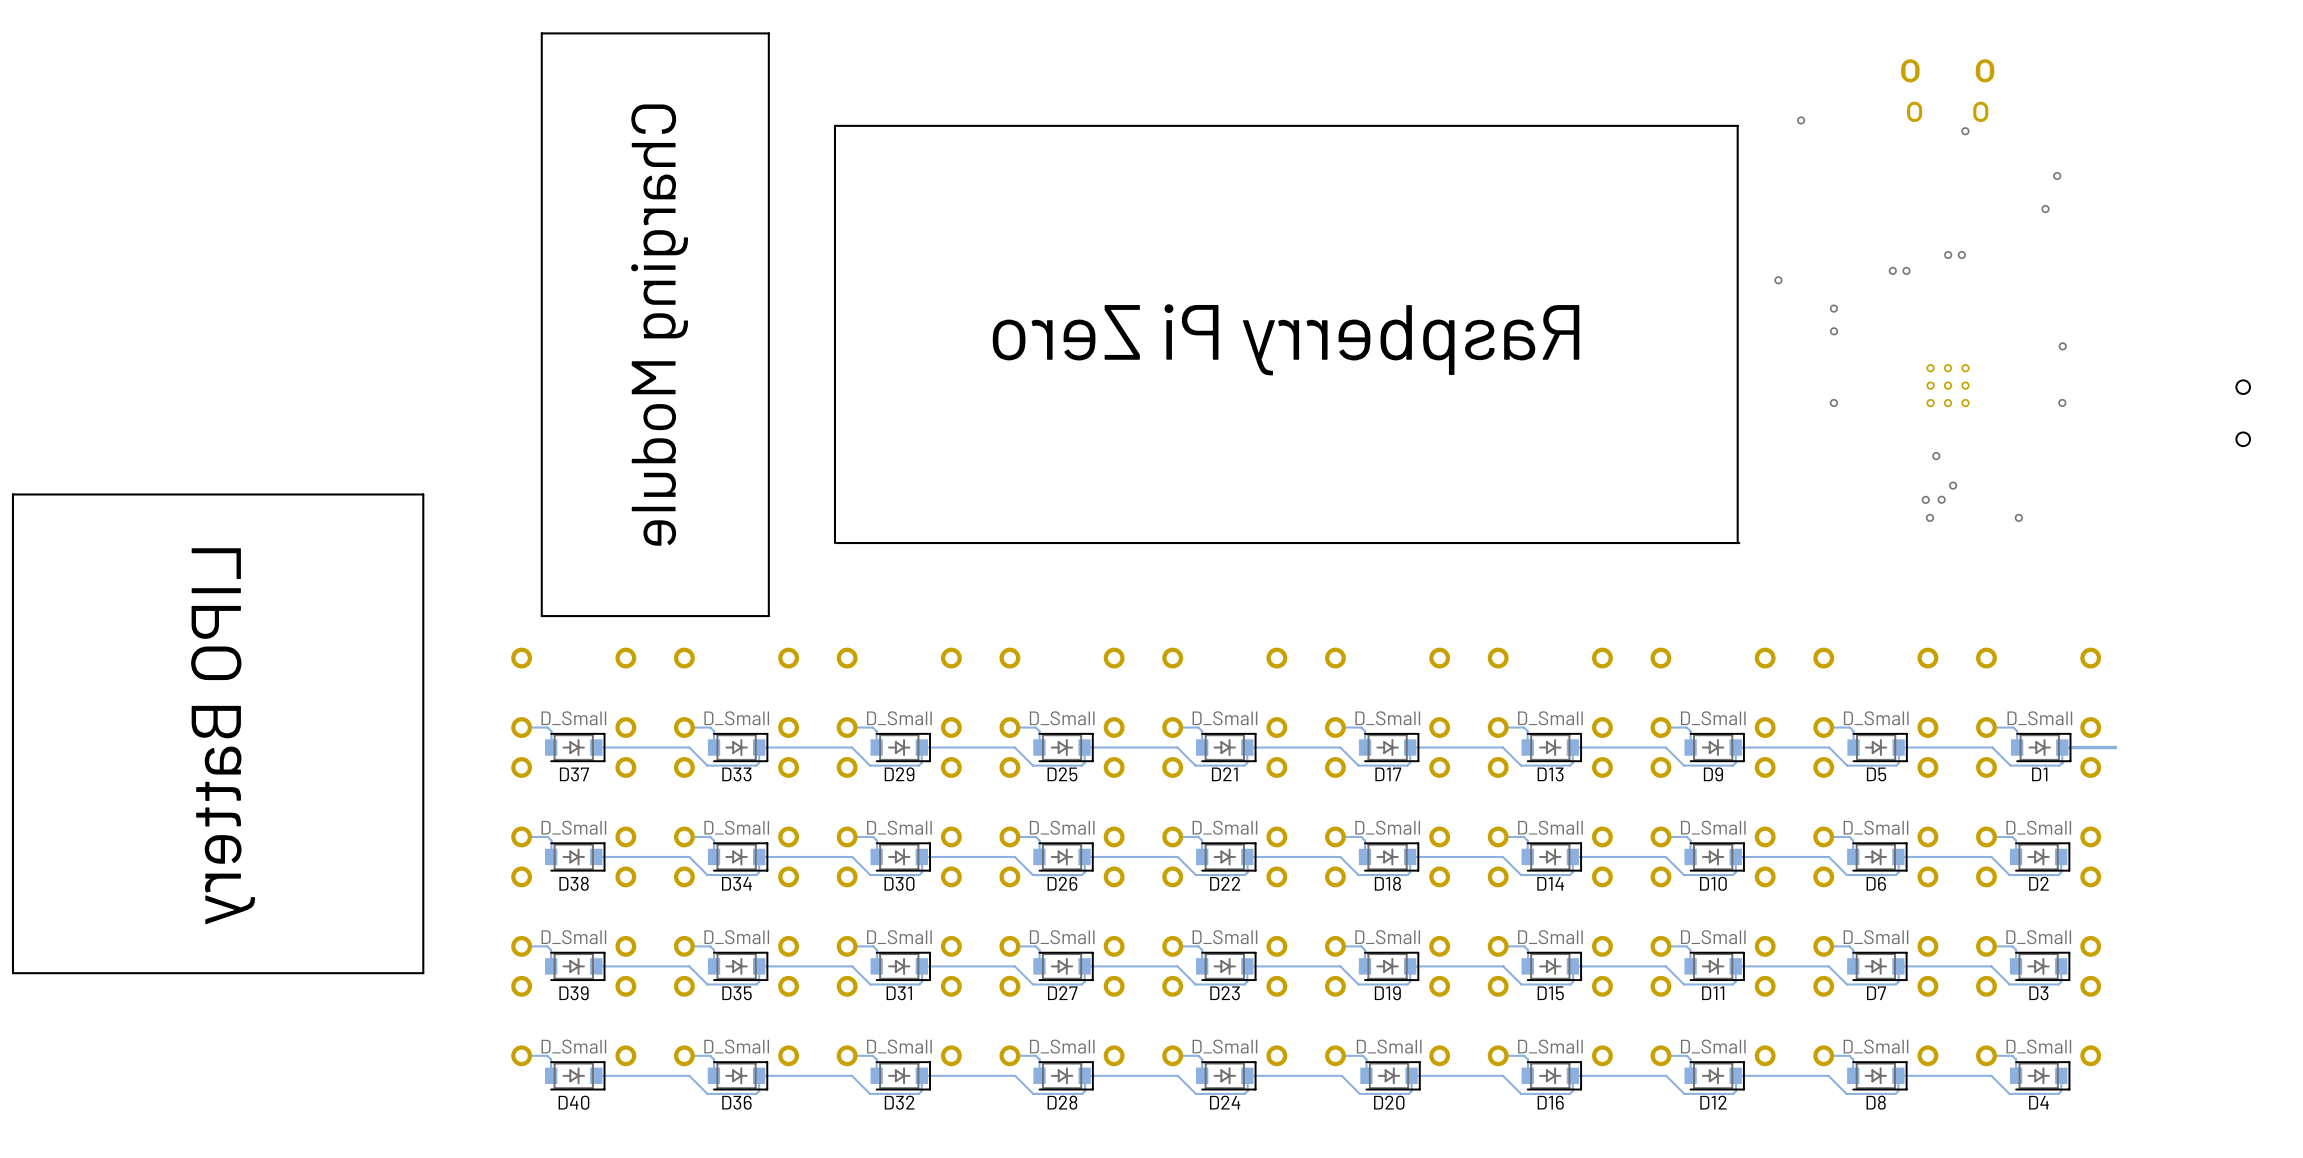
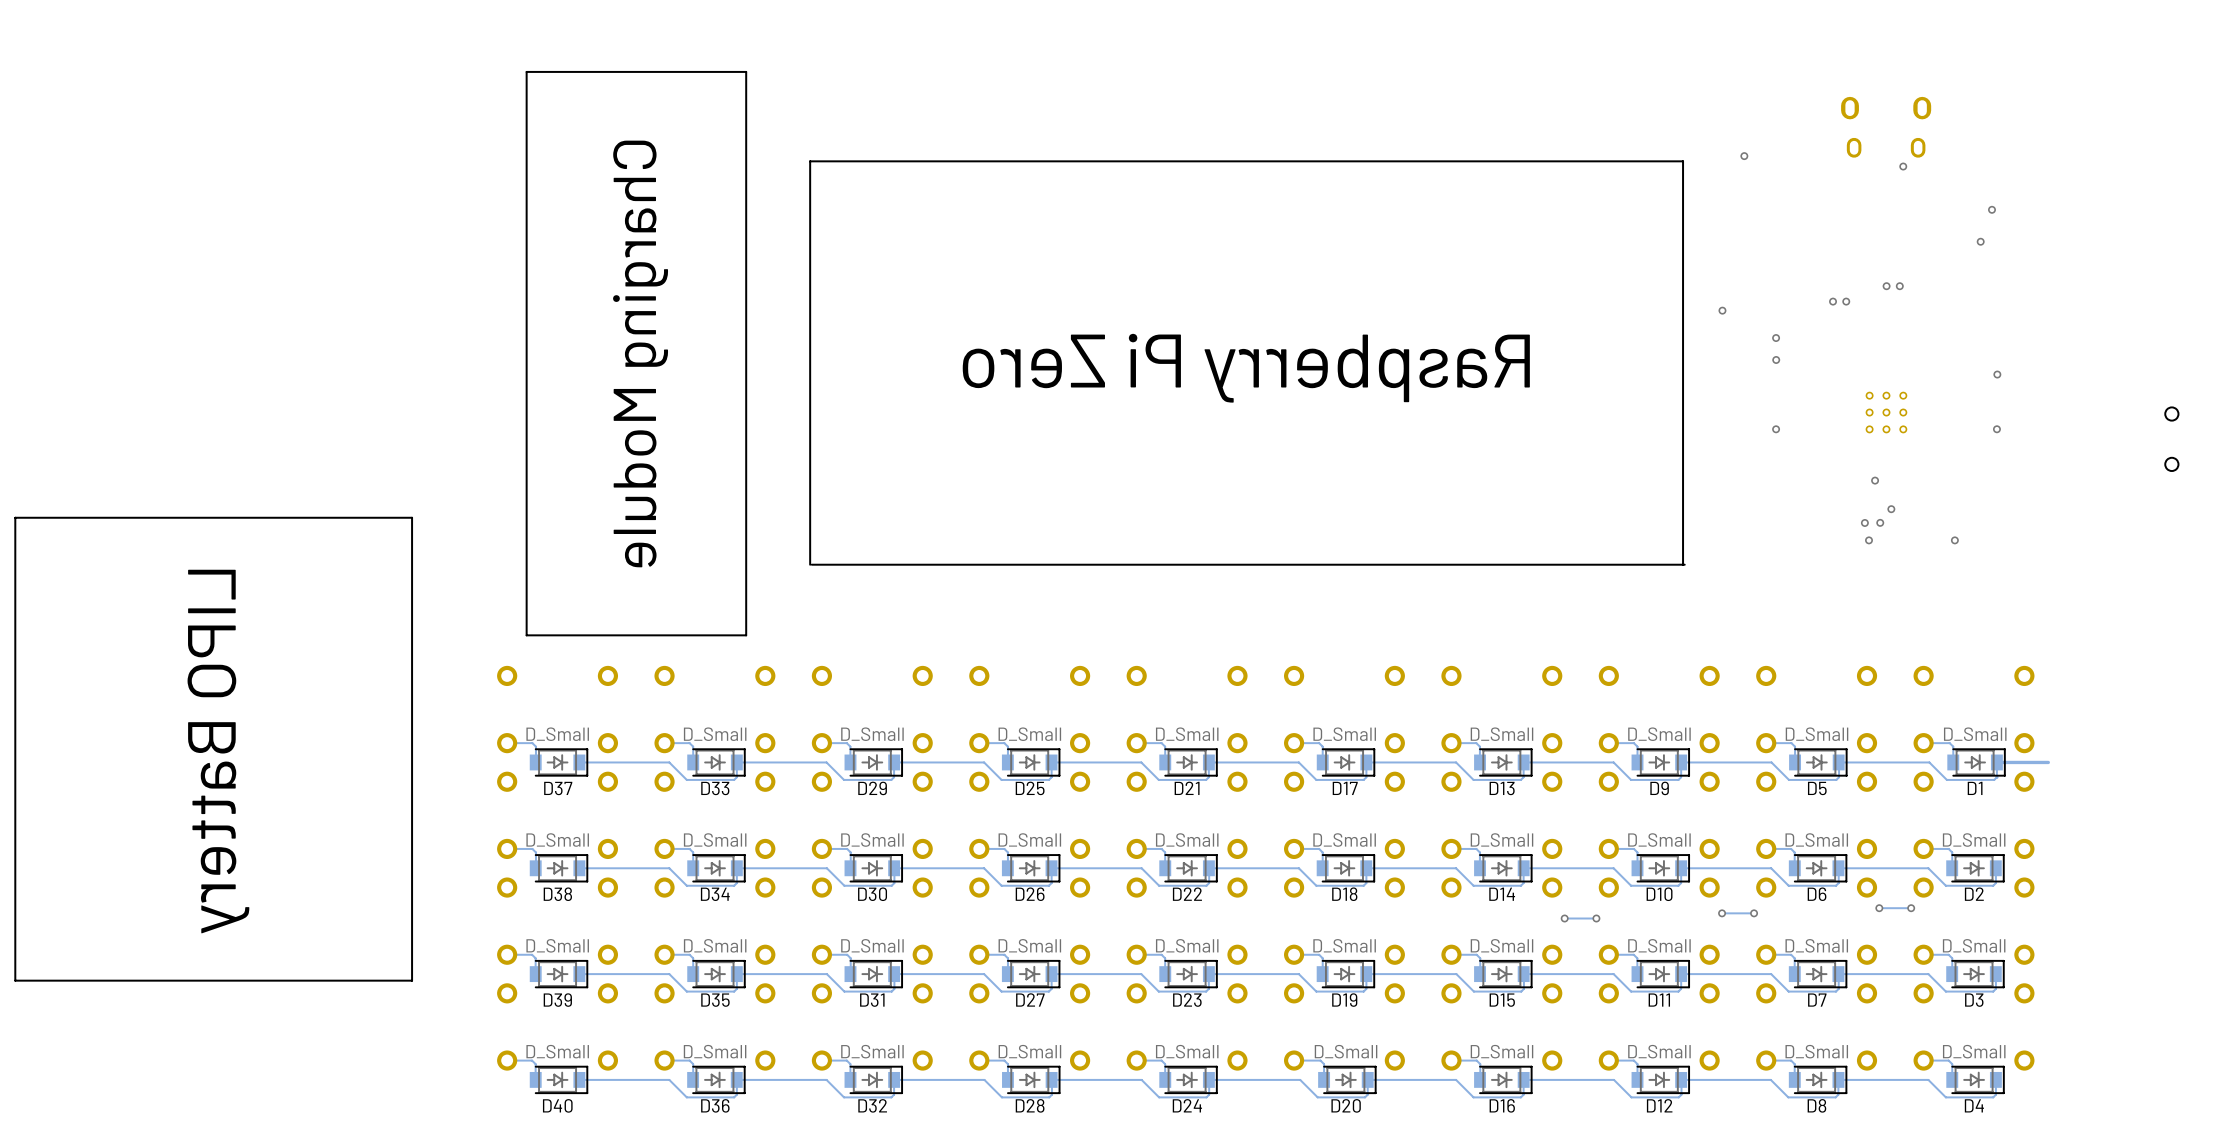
via: none -> (1879, 908)
track: none -> (1911, 908) (1879, 908)
via: none -> (1911, 908)
via: none -> (1722, 913)
track: none -> (1754, 913) (1722, 913)
via: none -> (1754, 913)
via: none -> (1564, 918)
track: none -> (1596, 918) (1564, 918)
via: none -> (1596, 918)

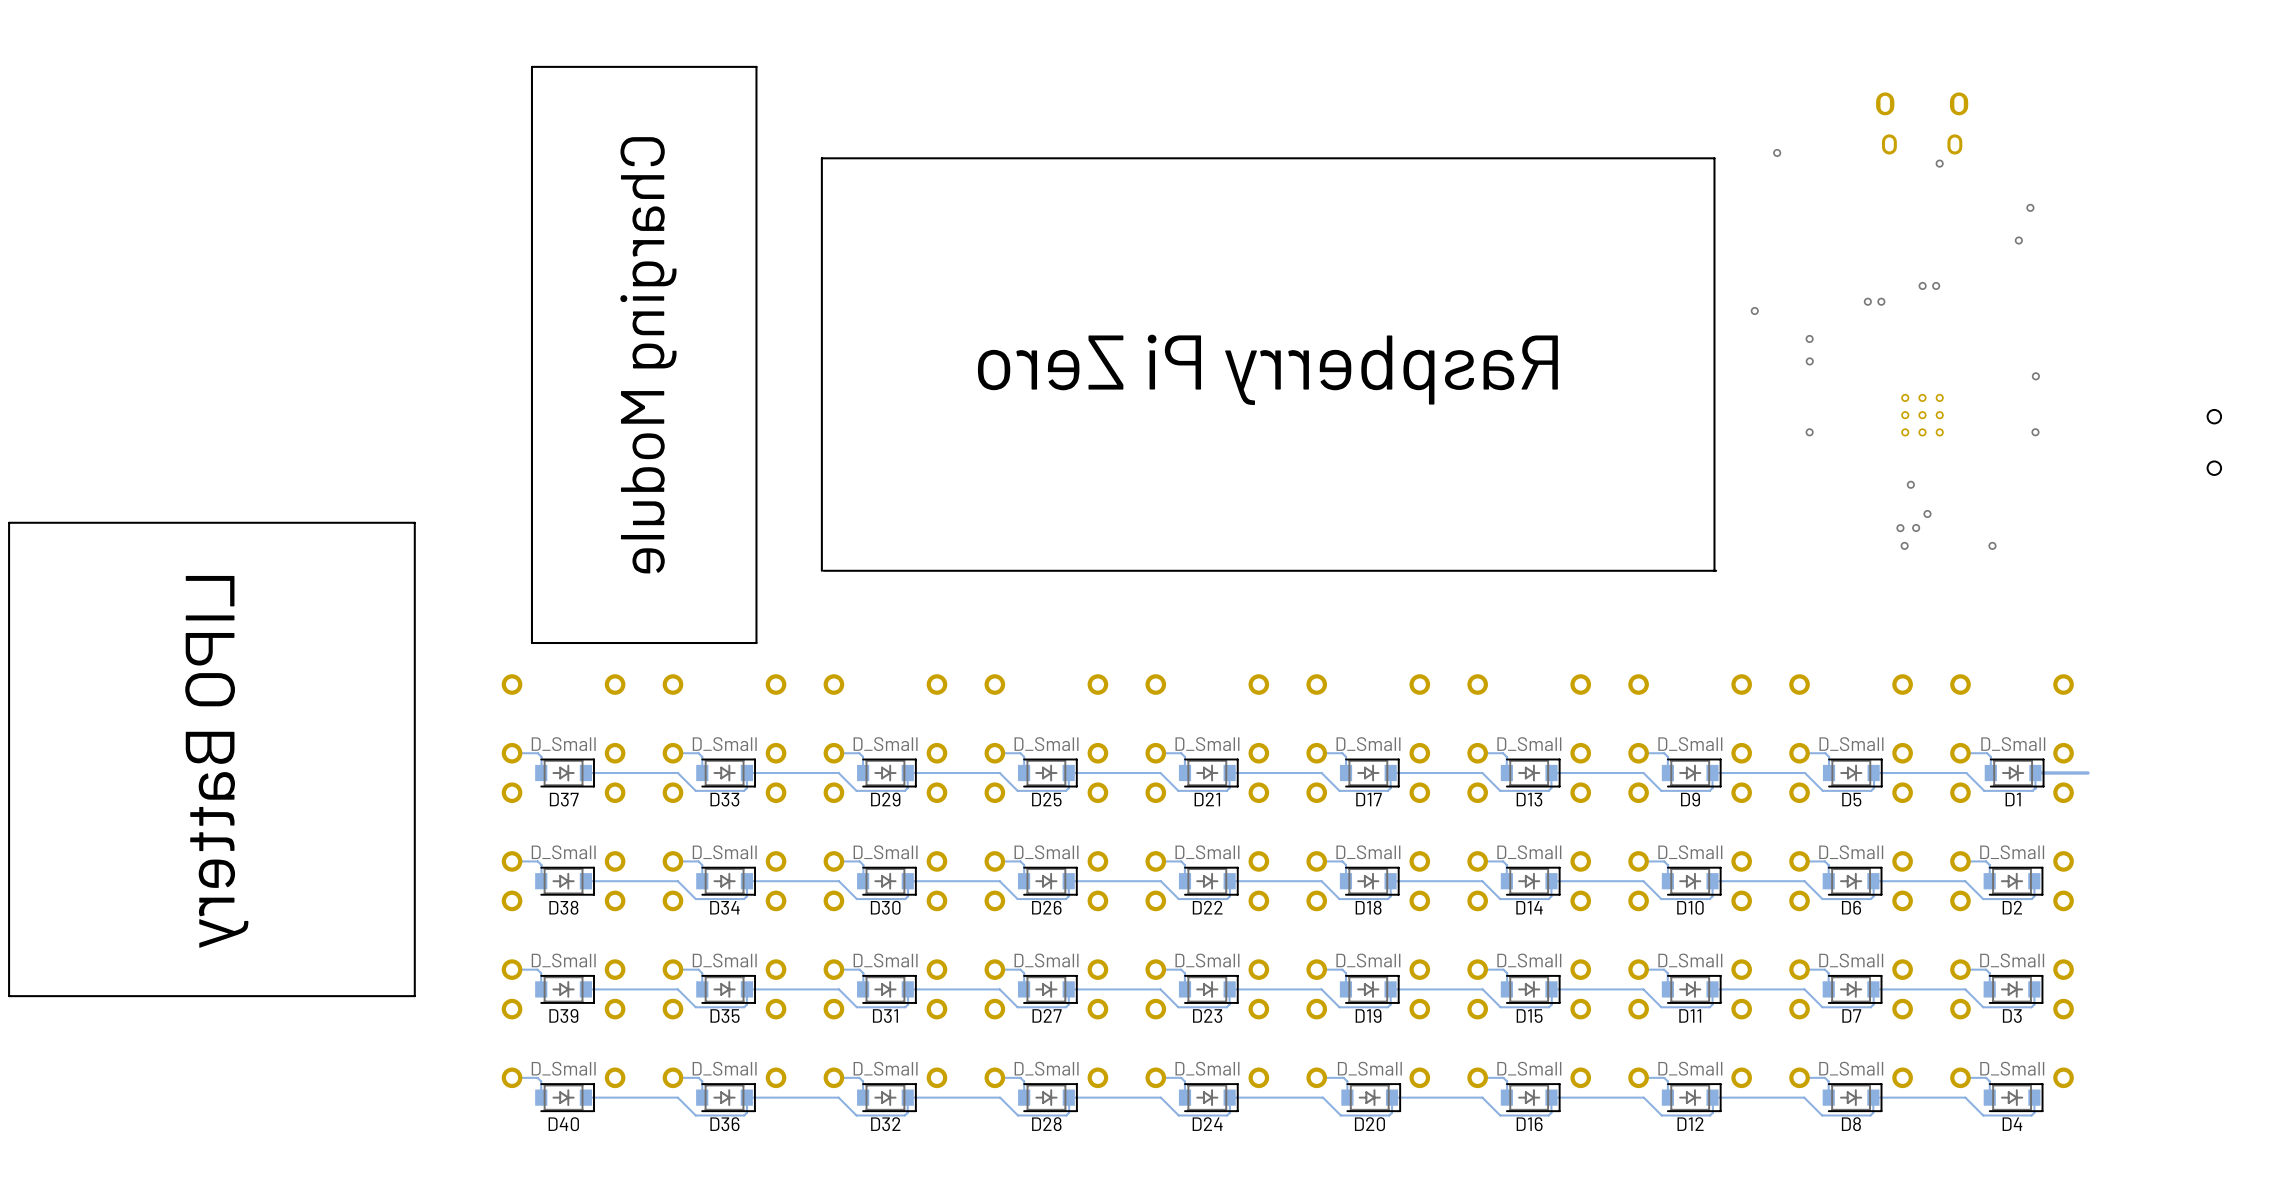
via: (1879, 908) -> none
track: (1911, 908) (1879, 908) -> none
via: (1911, 908) -> none
via: (1722, 913) -> none
track: (1754, 913) (1722, 913) -> none
via: (1754, 913) -> none
via: (1564, 918) -> none
track: (1596, 918) (1564, 918) -> none
via: (1596, 918) -> none

